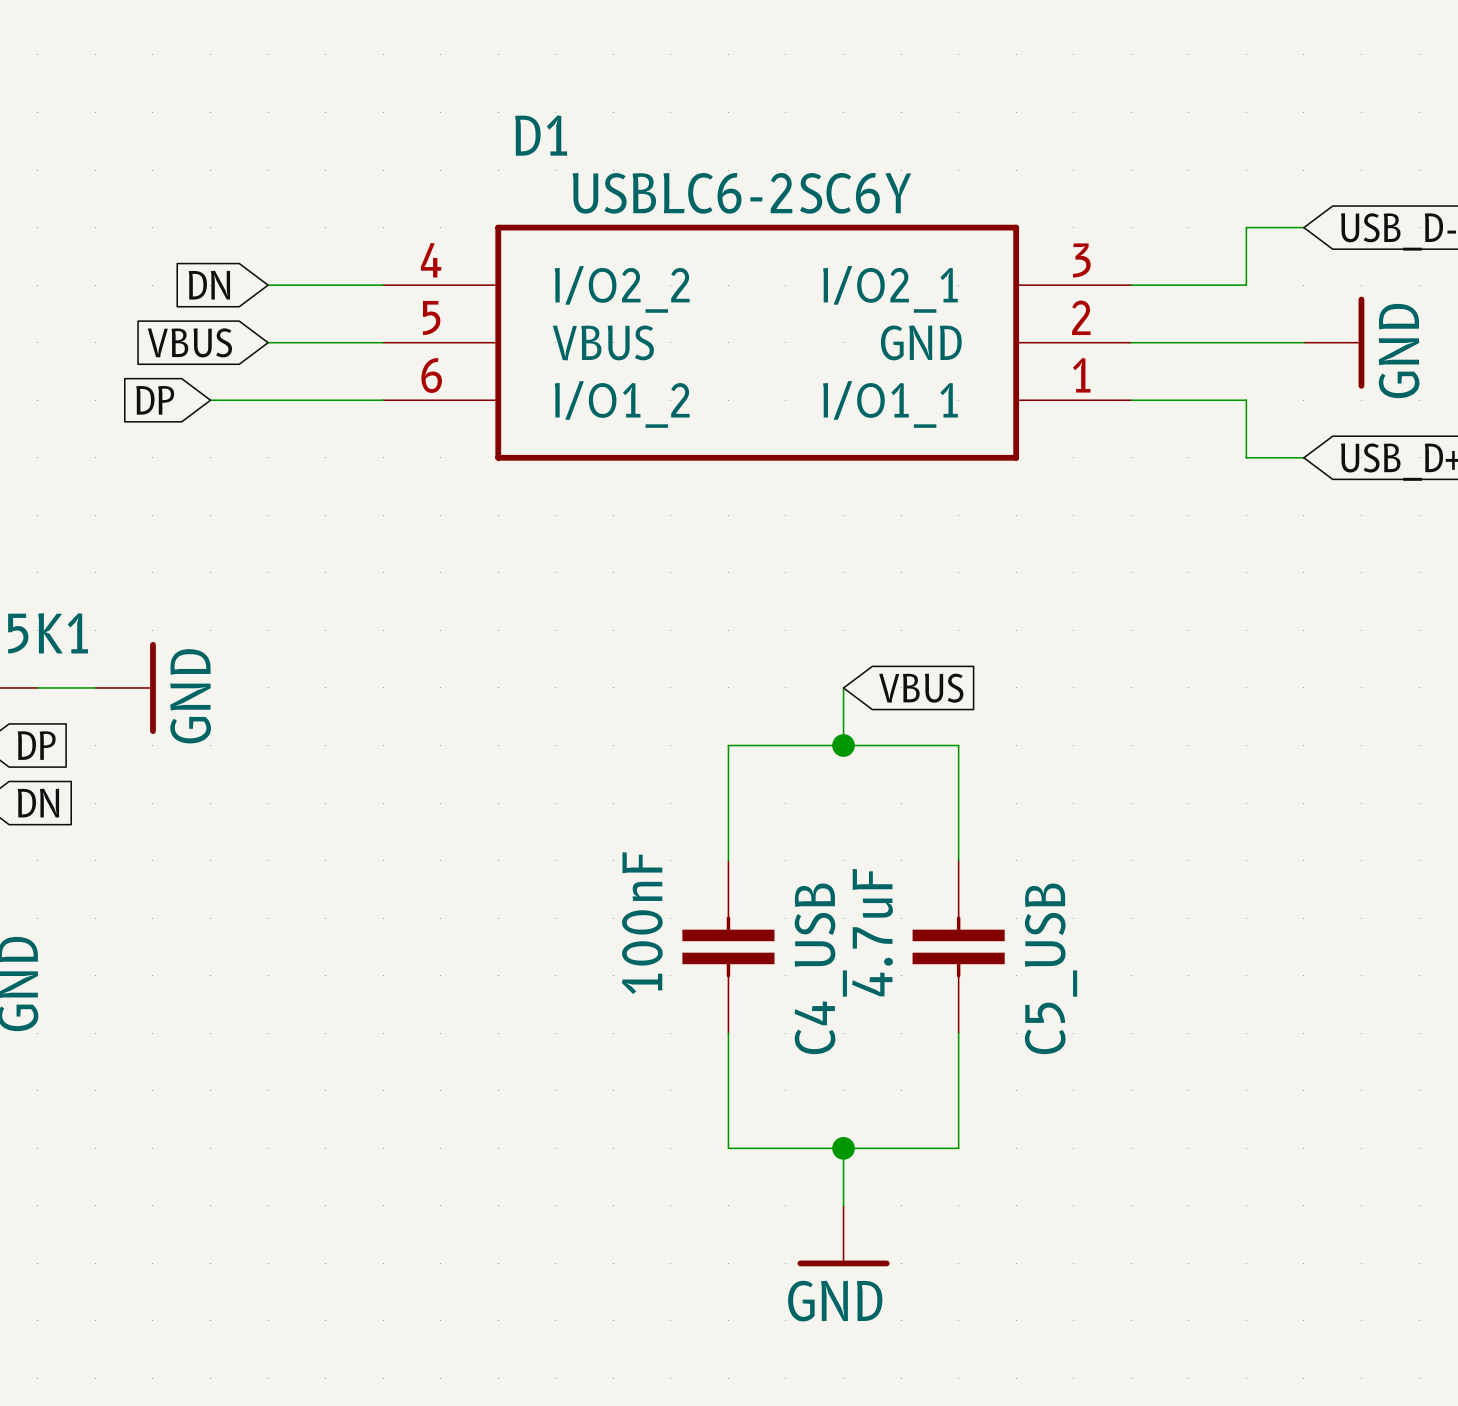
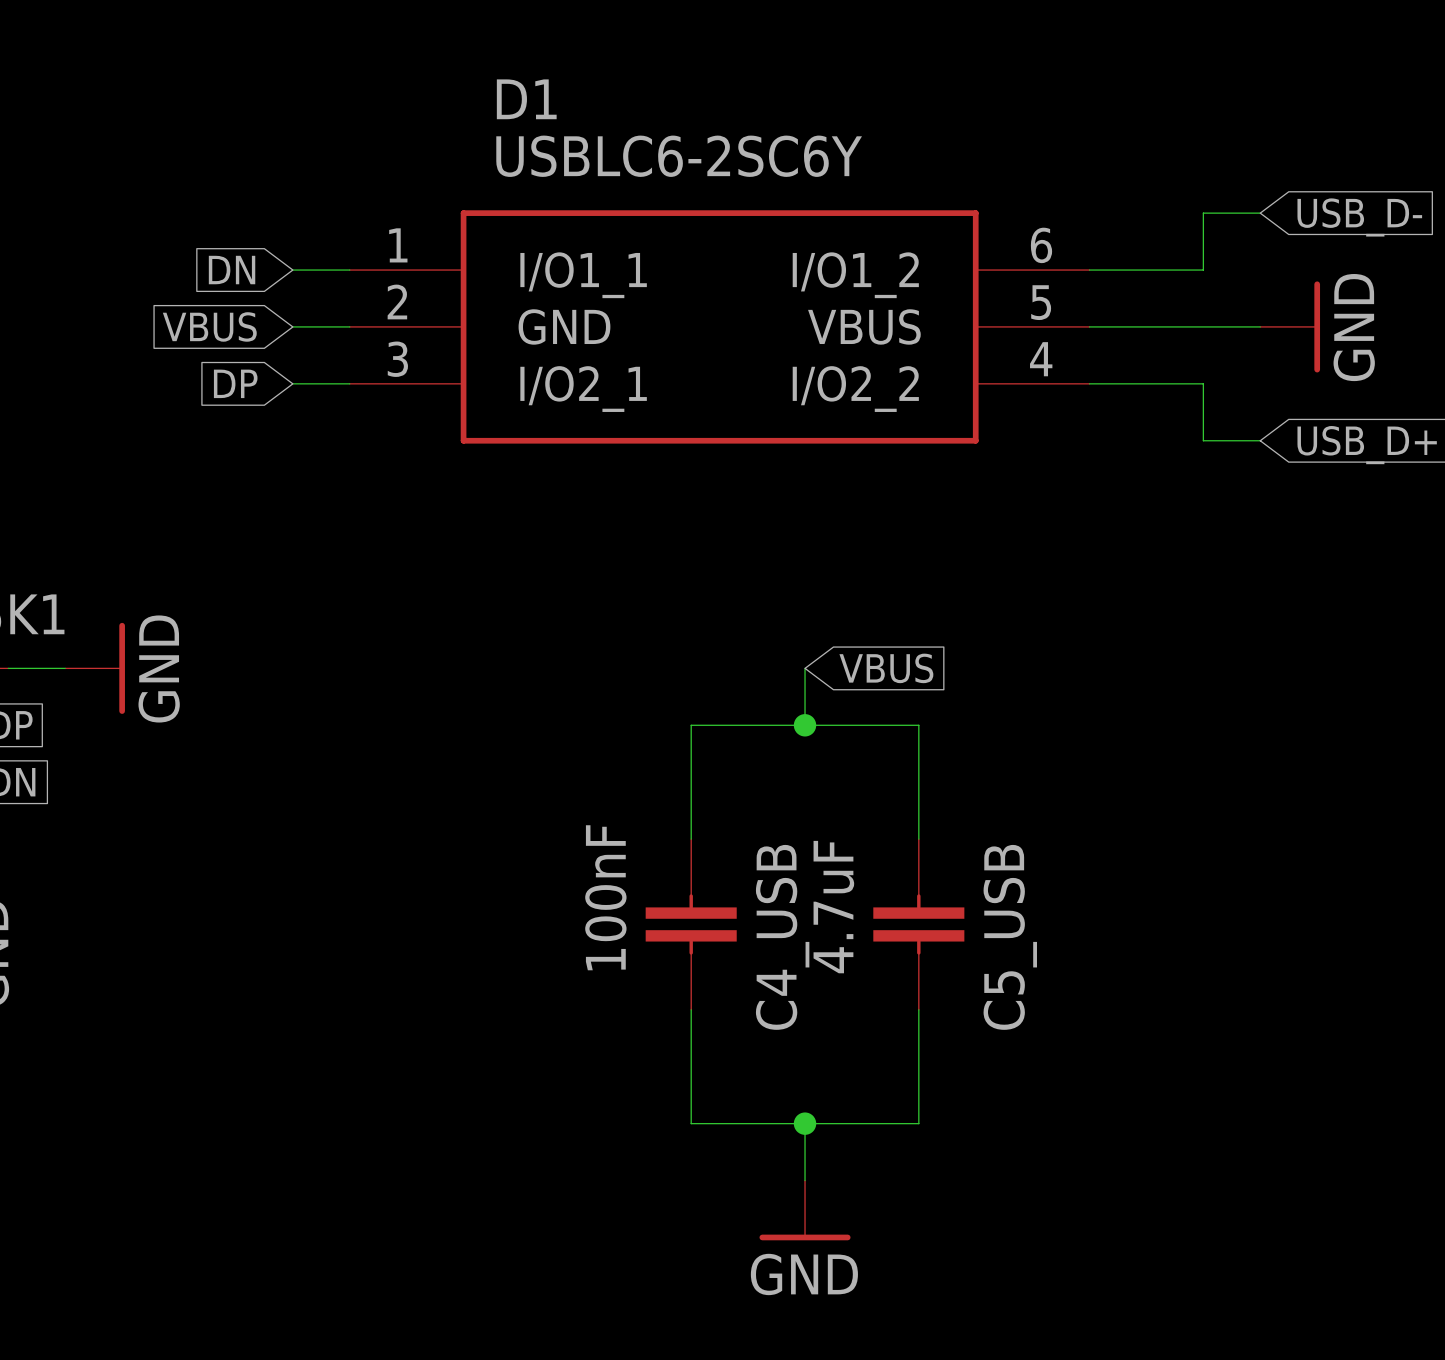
D1 name position: D1 (541, 135) -> D1 (526, 99)
D1 value position: USBLC6-2SC6Y (741, 193) -> USBLC6-2SC6Y (679, 156)
global label position: DN (209, 285) -> DN (232, 270)
wire: (268, 285) (325, 285) -> none
global label position: VBUS (189, 342) -> VBUS (209, 326)
wire: (268, 342) (325, 342) -> none
D1 rotation: 0° (757, 342) -> 180° (719, 326)
global label position: DP (155, 400) -> DP (235, 383)
wire: (210, 400) (325, 400) -> none

